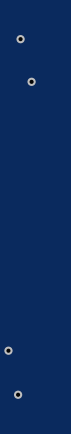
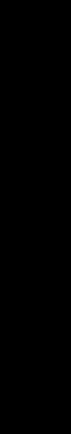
via: (20, 39) -> none
via: (31, 81) -> none
via: (8, 350) -> none
via: (18, 394) -> none

